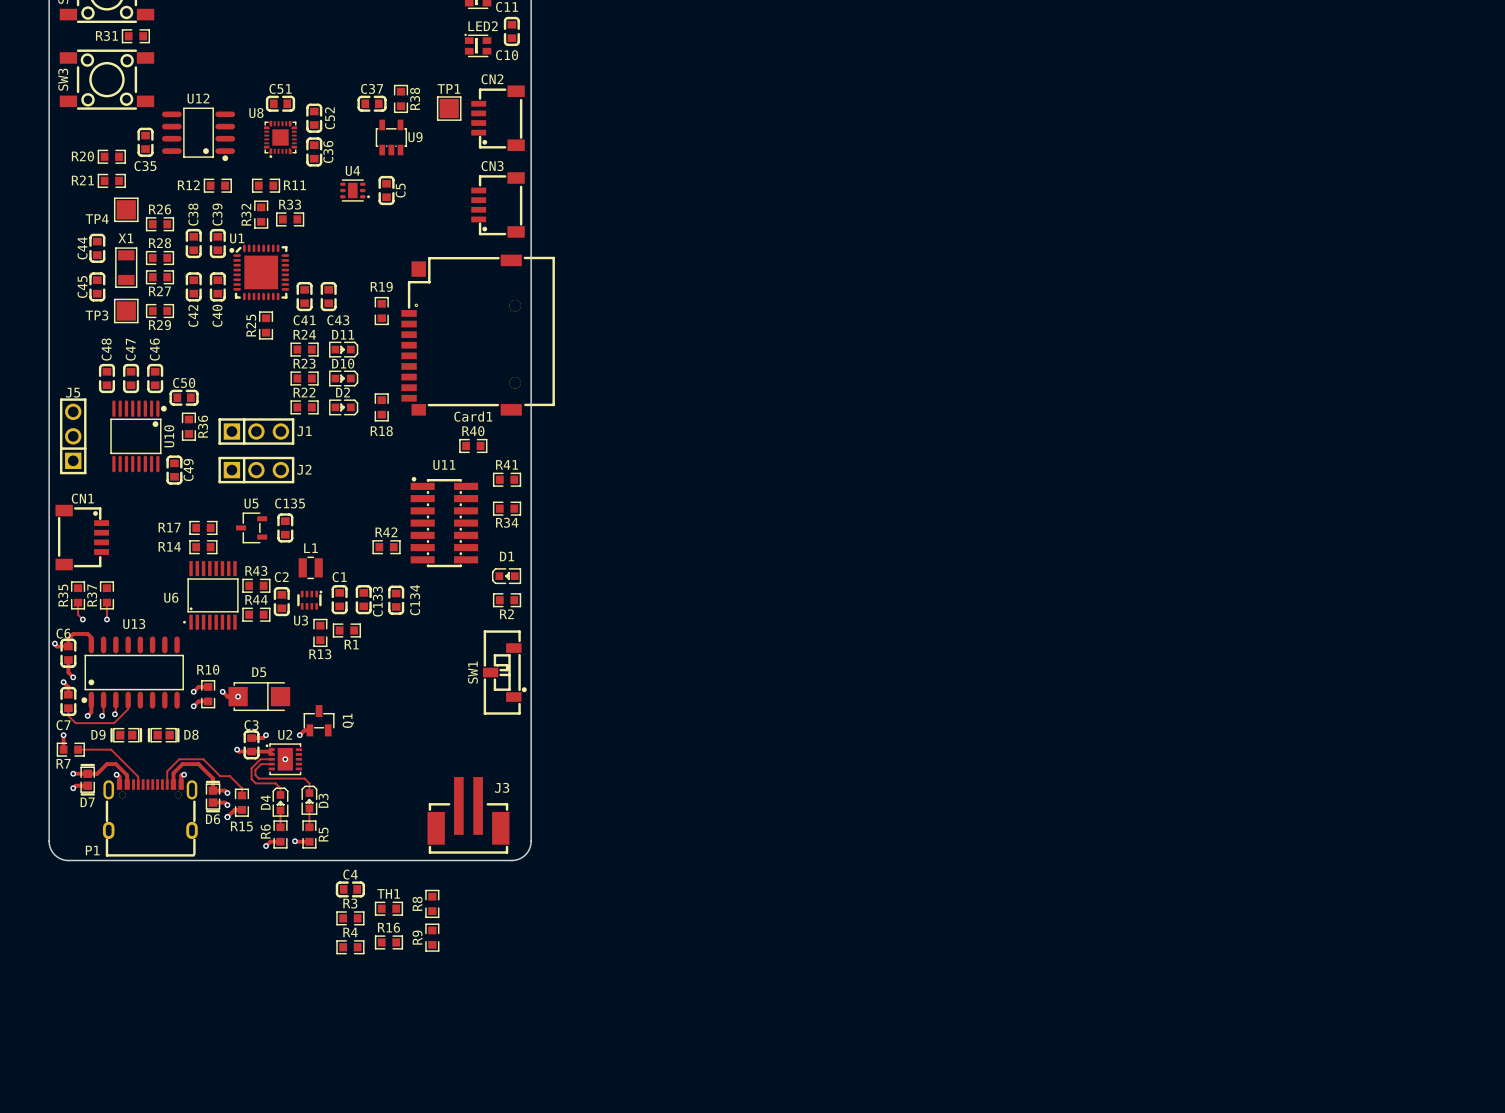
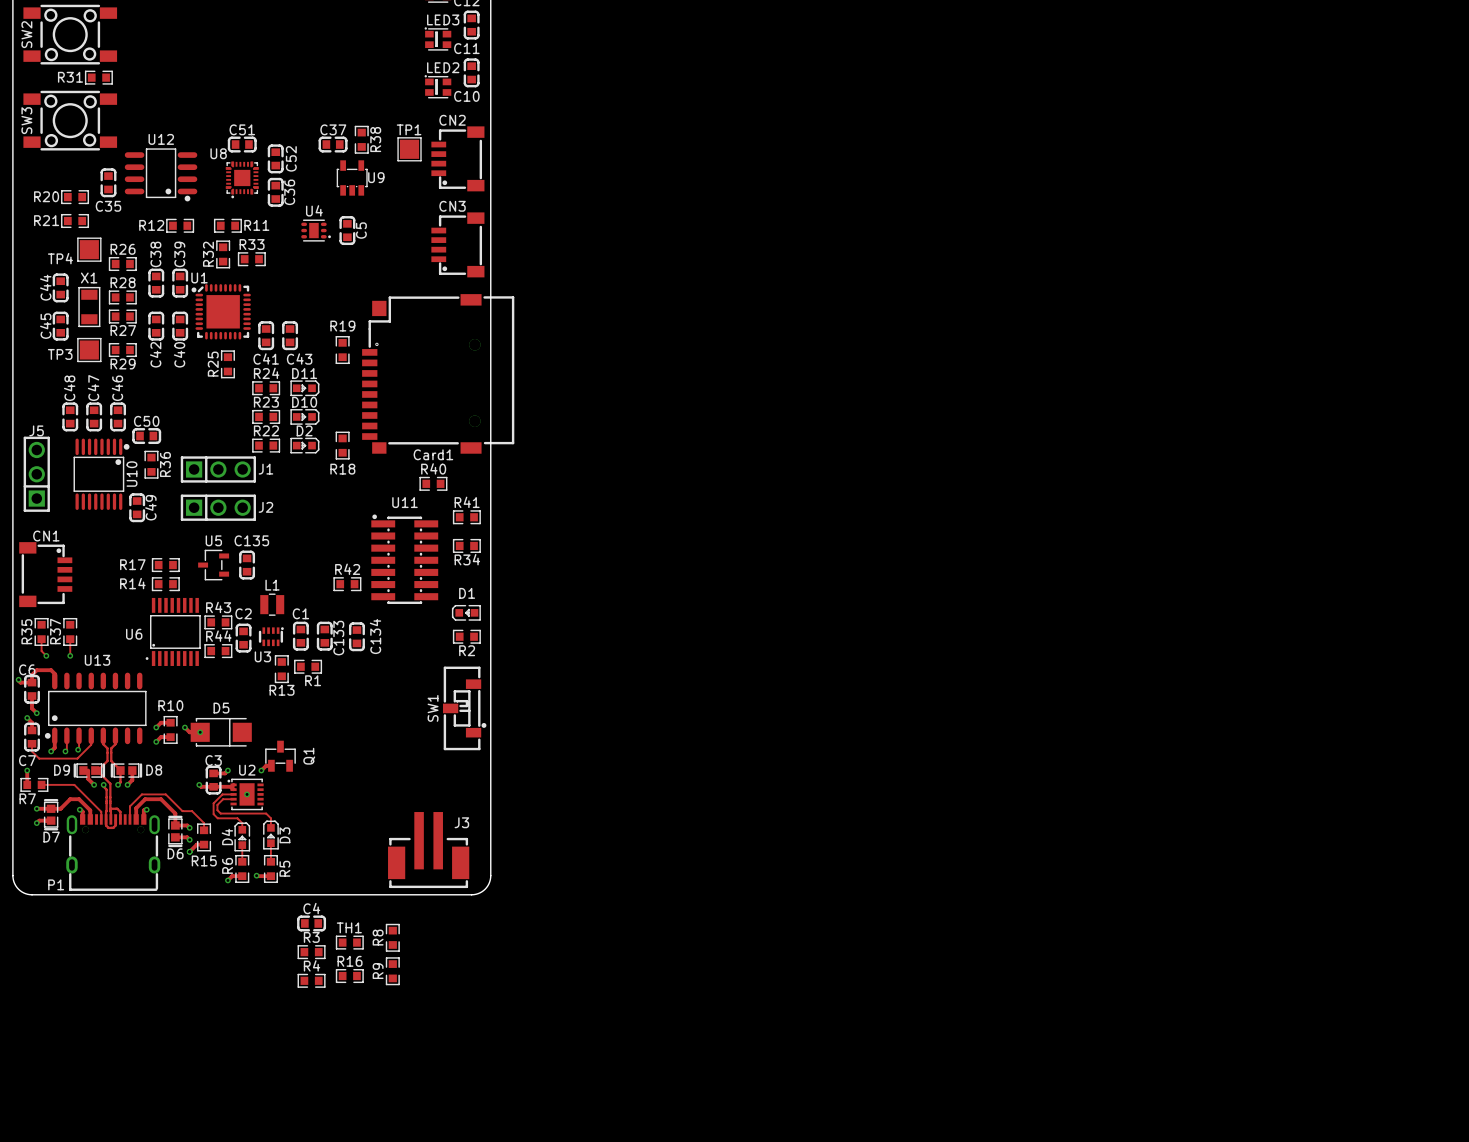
track: none -> (103, 735) (103, 744) (107, 748) (107, 760) (100, 768) (100, 773) (110, 783) (110, 819)
track: none -> (115, 735) (115, 744) (111, 748) (111, 760) (120, 770) (120, 782) (118, 784)
track: none -> (88, 770) (88, 778) (94, 784)
track: none -> (132, 770) (132, 780) (127, 784)
via: none -> (94, 784)
track: none -> (103, 784) (106, 789) (106, 825) (108, 827) (113, 827) (115, 825) (115, 819)
via: none -> (103, 784)
via: none -> (118, 784)
via: none -> (127, 784)
track: none -> (110, 808) (117, 808) (120, 811) (120, 819)

